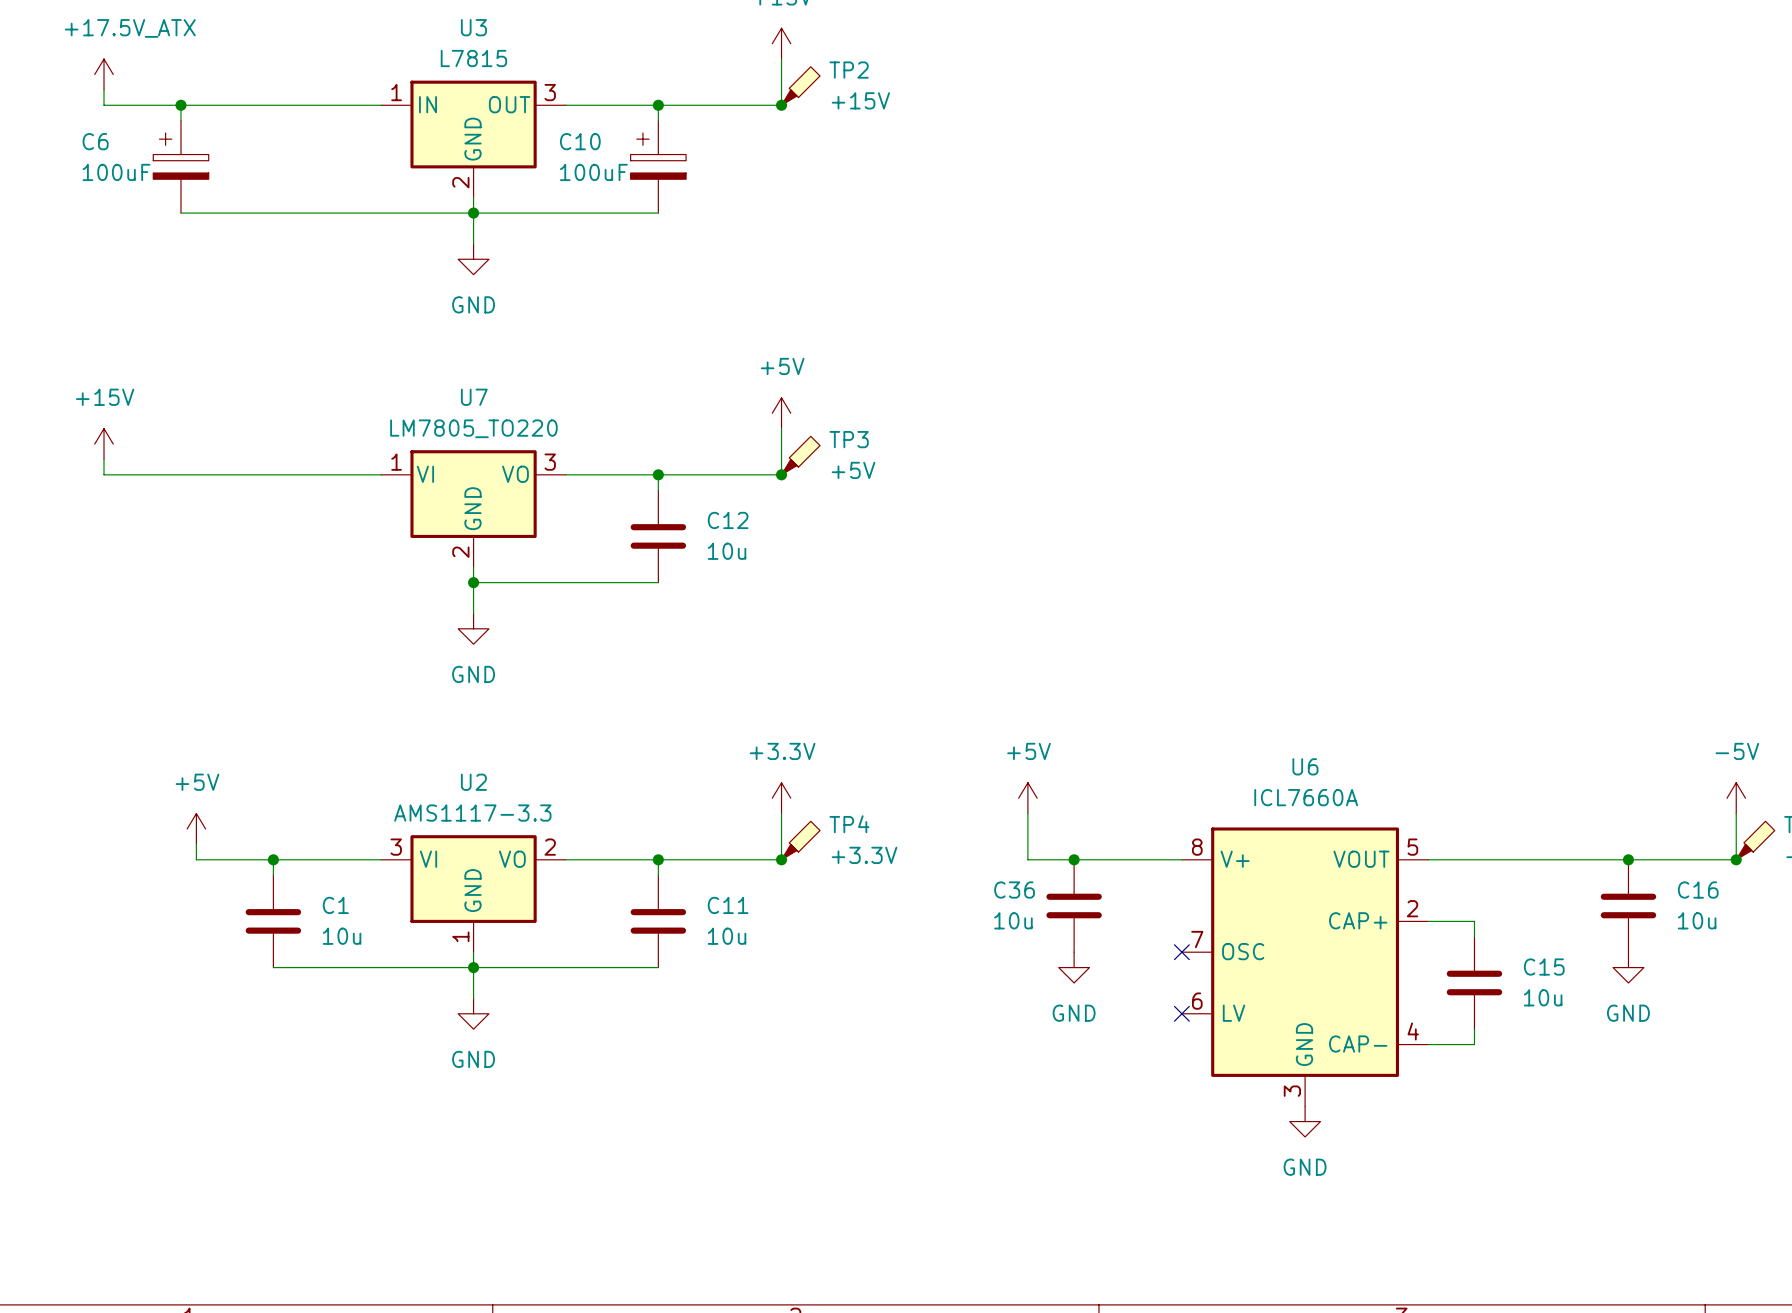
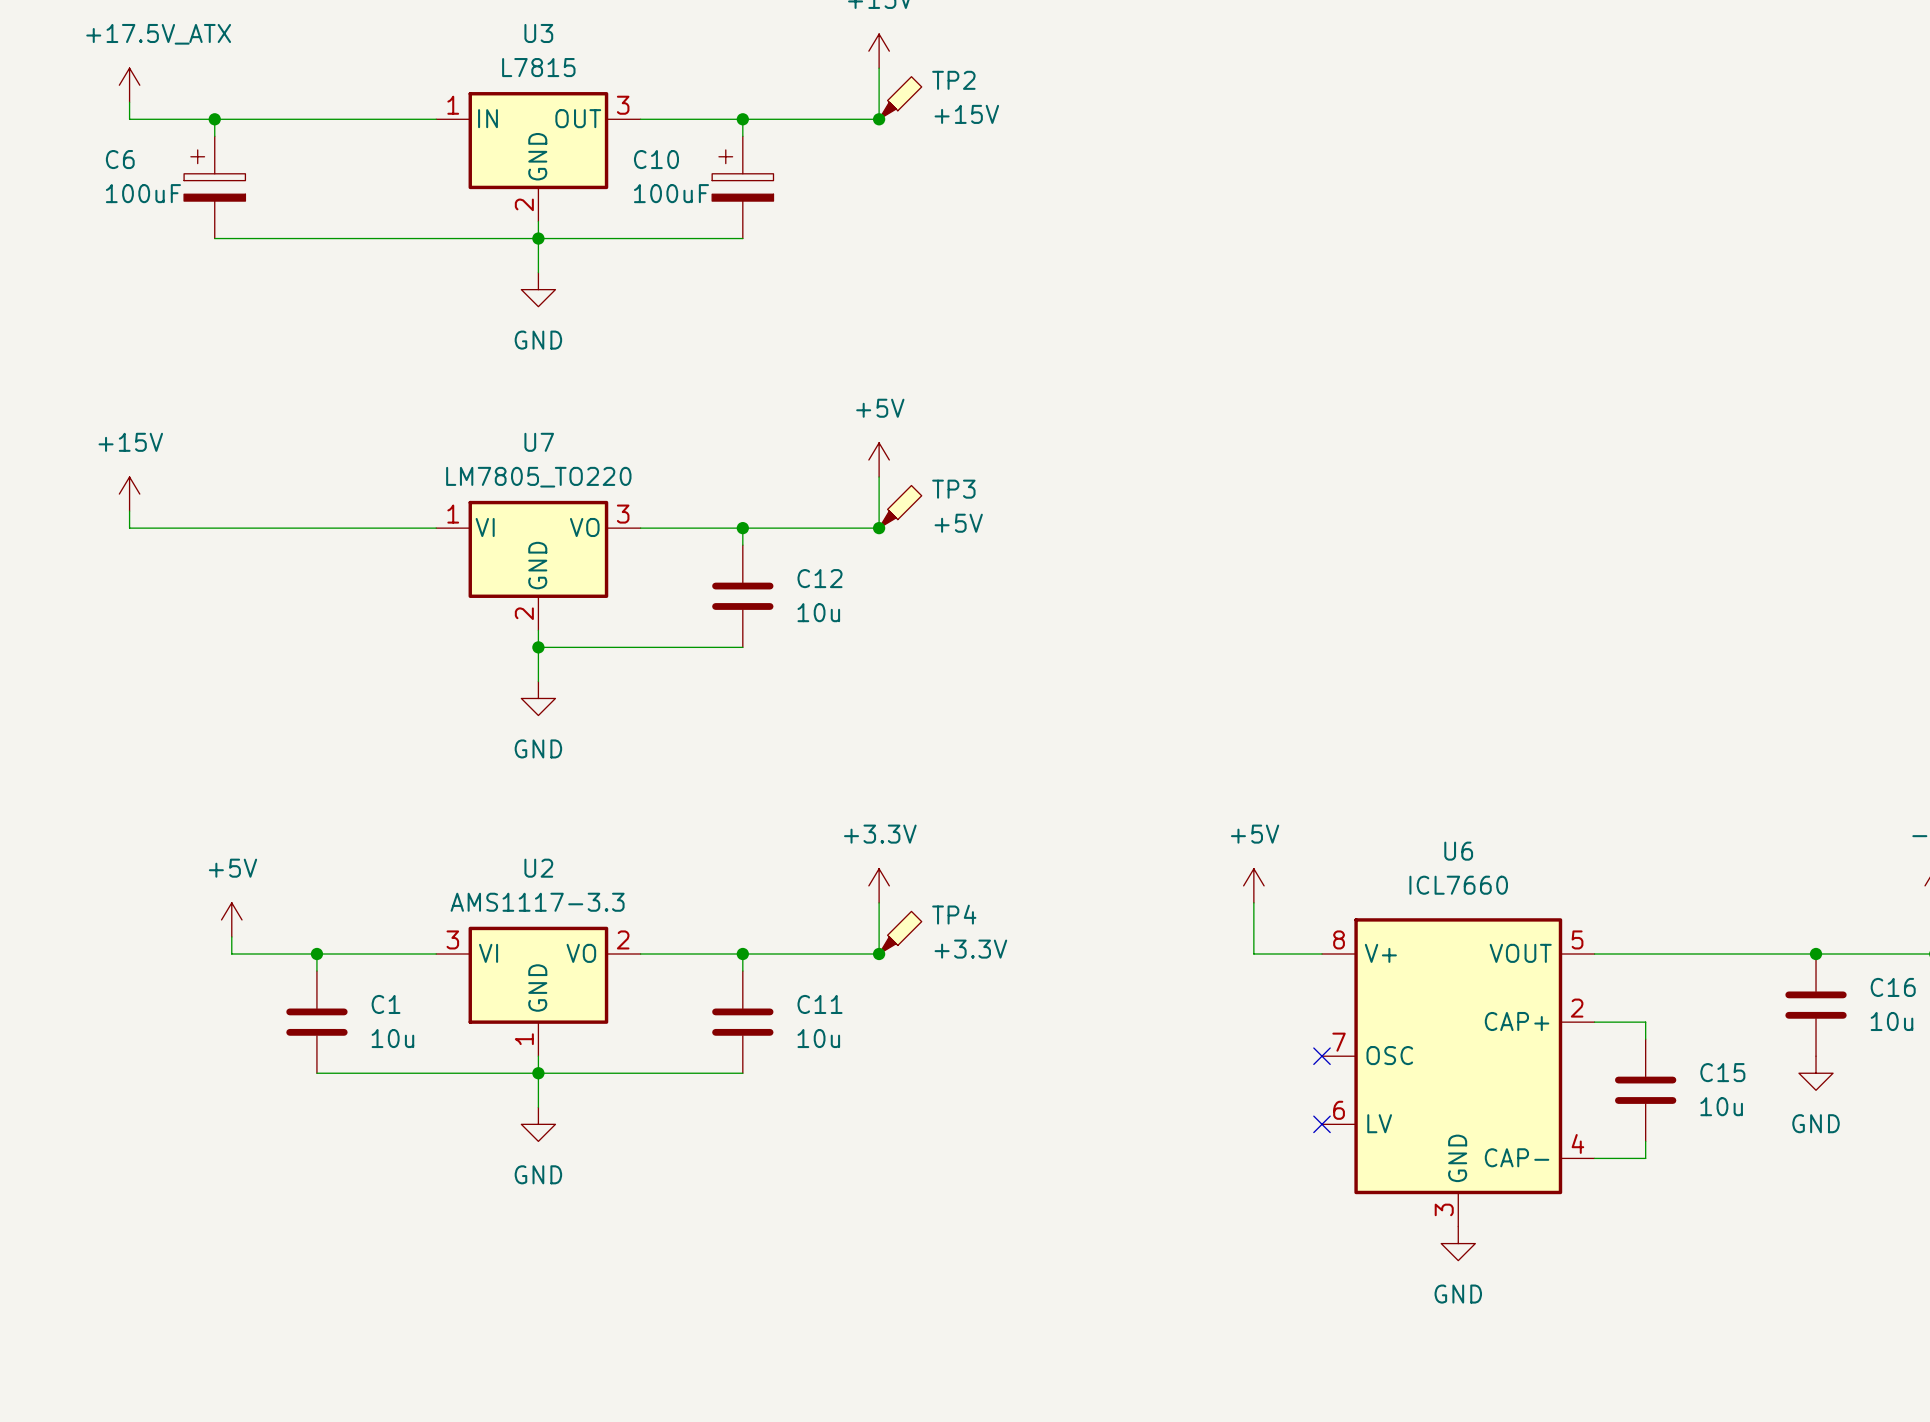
U6 value: ICL7660A (1306, 797) -> ICL7660 (1458, 885)
power symbol position: +5V (1027, 798) -> +5V (1253, 885)
wire: (1027, 813) (1027, 859) (1120, 859) -> (1253, 902) (1253, 953)
junction: (1074, 859) -> none
C36: 10u (1074, 906) -> none
power symbol: GND (1074, 967) -> none

